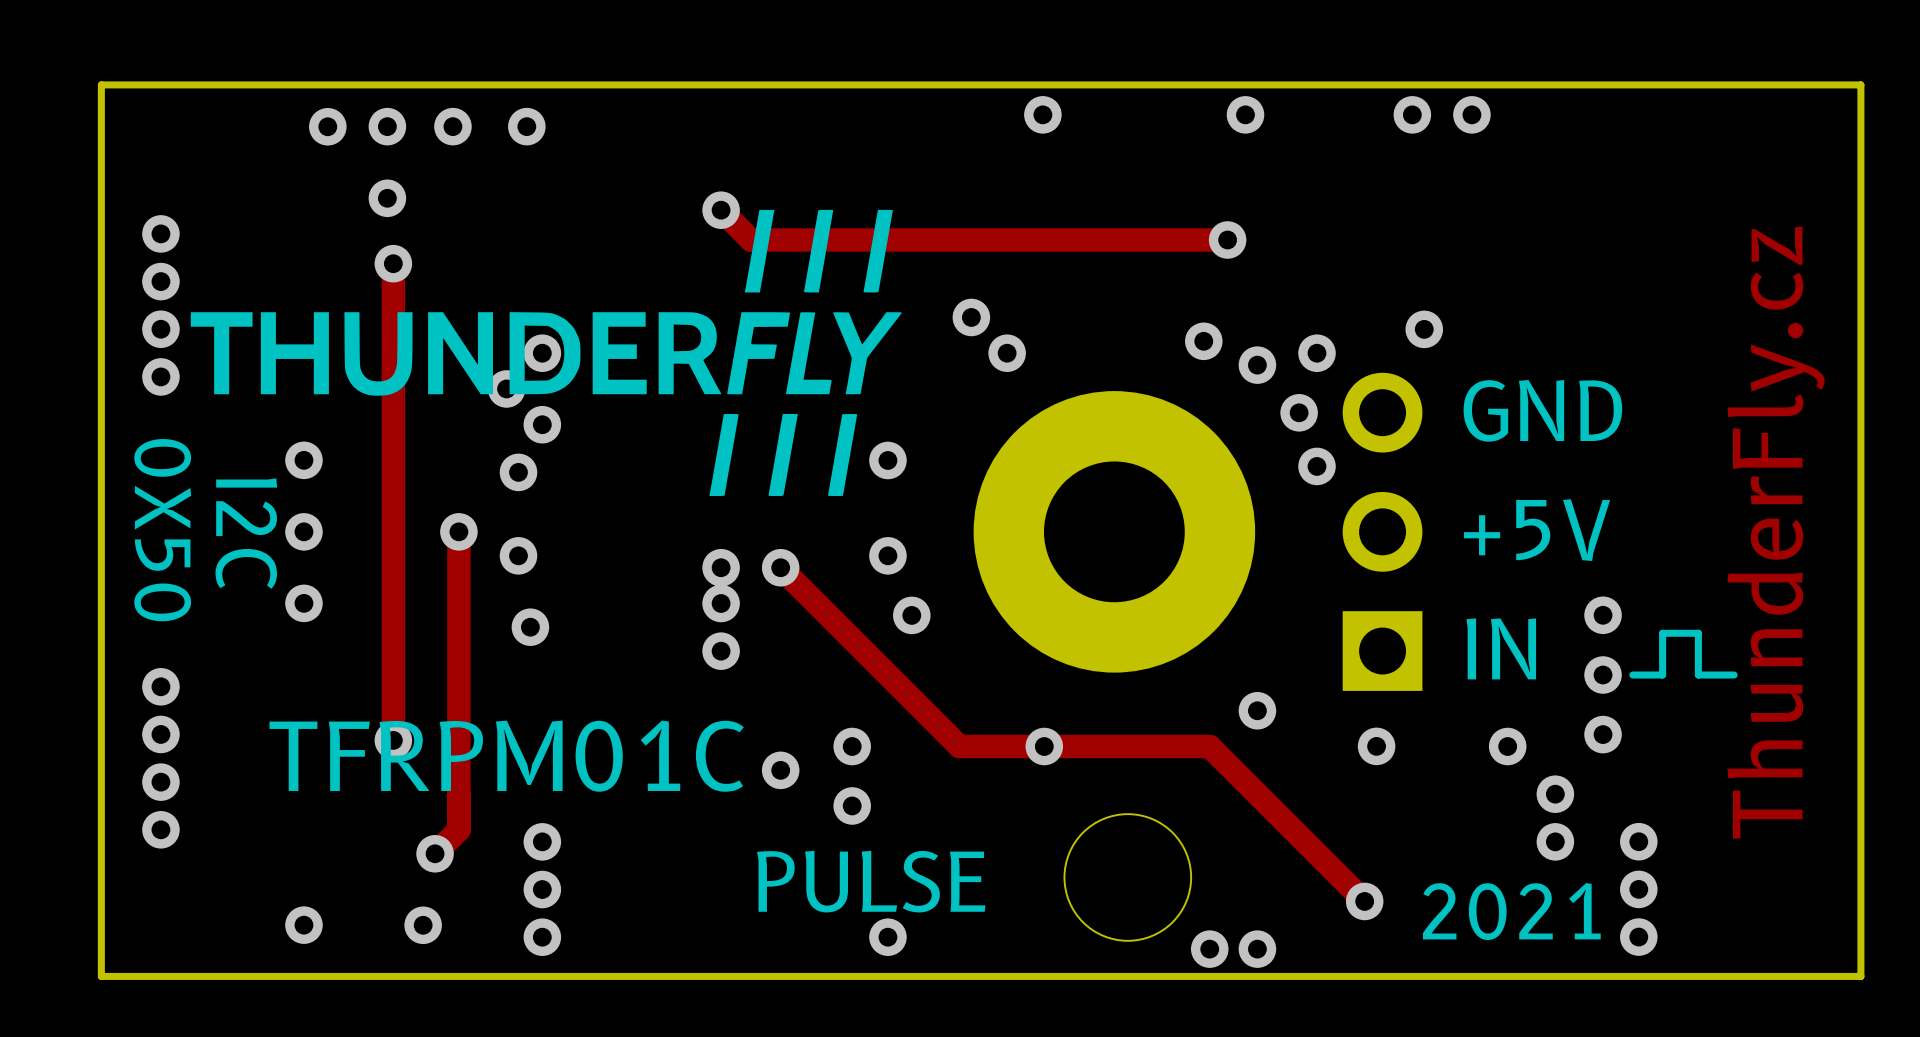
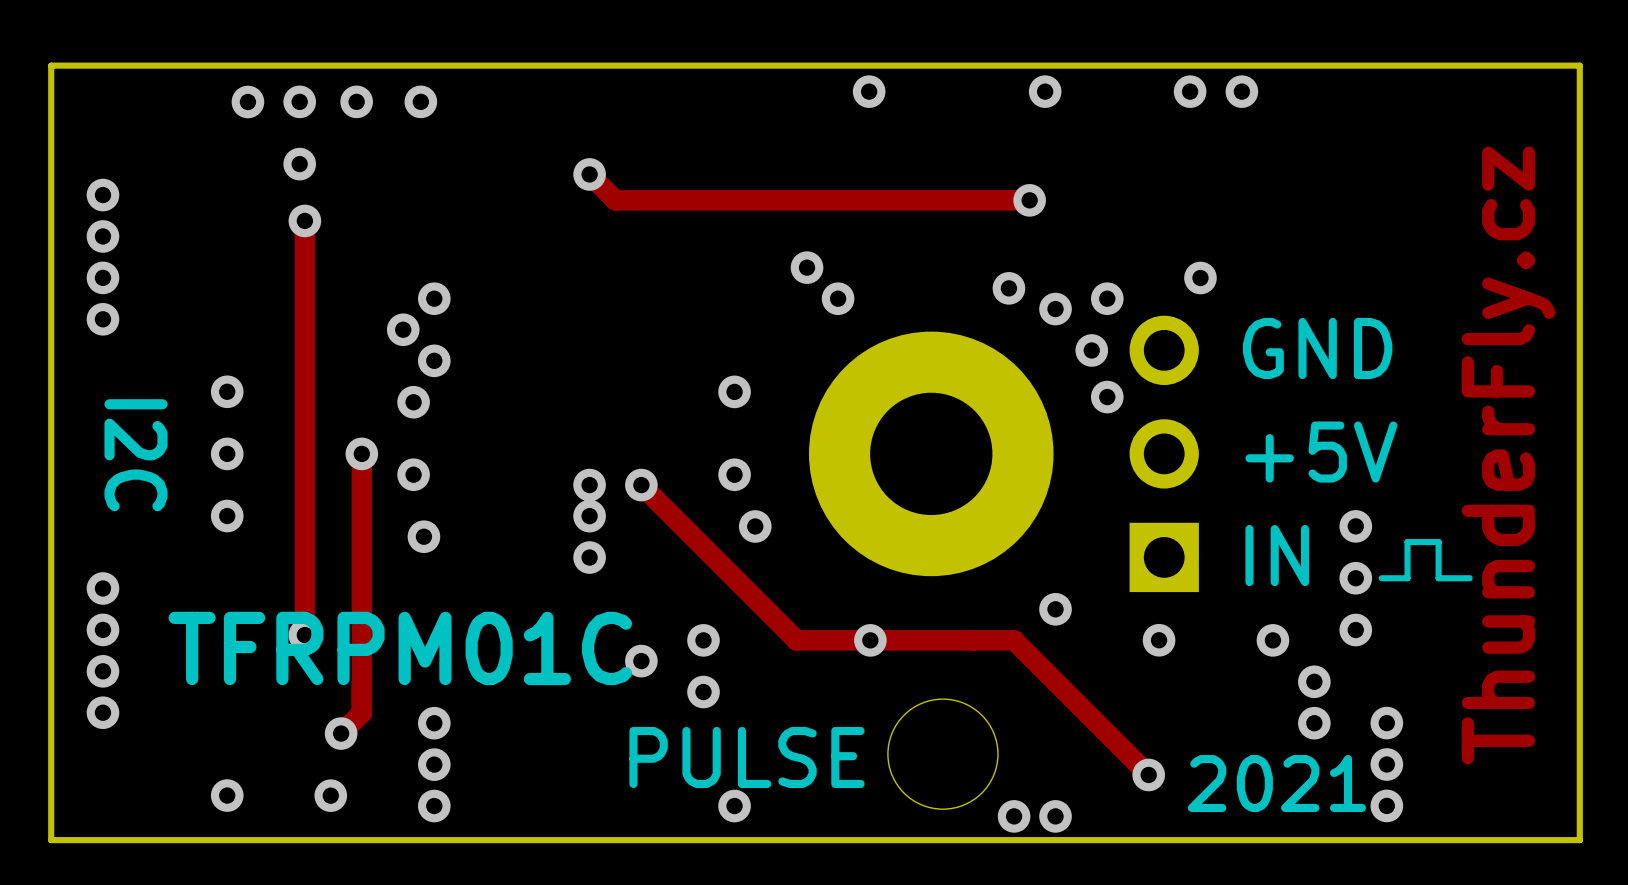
drawing: [190, 209, 902, 497] -> none
text: 0X50 (162, 530) -> none
text position: I2C (246, 533) -> I2C (136, 455)

